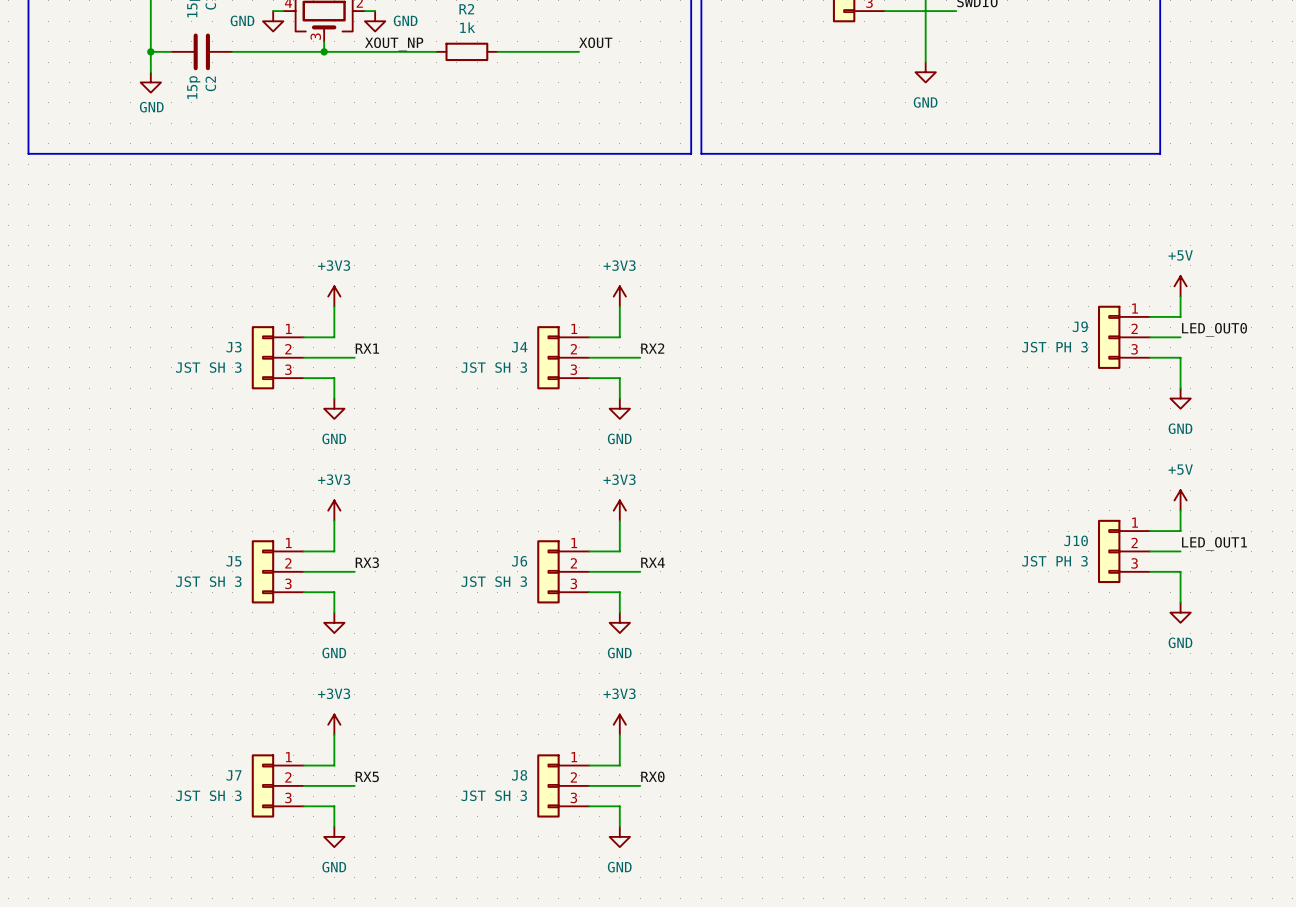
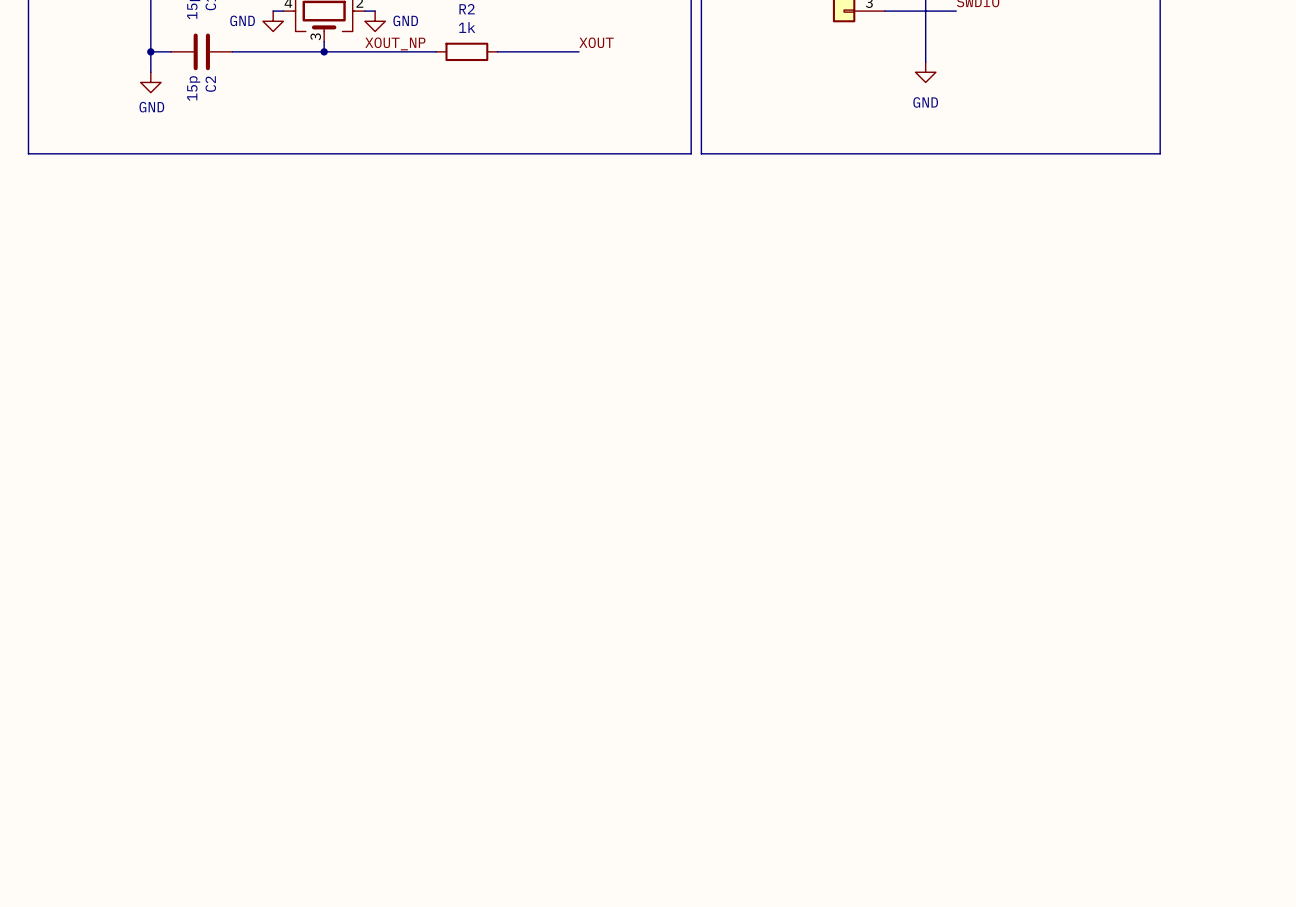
power symbol: +5V (1180, 286) -> none
power symbol: +3V3 (334, 296) -> none
power symbol: +3V3 (619, 296) -> none
wire: (1180, 296) (1180, 316) (1149, 316) -> none
wire: (334, 306) (334, 337) (303, 337) -> none
wire: (619, 306) (619, 337) (589, 337) -> none
label: LED_OUT0 (1214, 329) -> none
J9: JST PH 3 (1123, 337) -> none
wire: (1149, 337) (1180, 337) -> none
label: RX1 (367, 348) -> none
label: RX2 (652, 348) -> none
J3: JST SH 3 (277, 357) -> none
wire: (303, 357) (354, 357) -> none
J4: JST SH 3 (563, 357) -> none
wire: (589, 357) (640, 357) -> none
wire: (1149, 357) (1180, 357) (1180, 388) -> none
wire: (303, 378) (334, 378) (334, 398) -> none
wire: (589, 378) (619, 378) (619, 398) -> none
power symbol: GND (1180, 398) -> none
power symbol: GND (334, 408) -> none
power symbol: GND (619, 408) -> none
power symbol: +5V (1180, 500) -> none
power symbol: +3V3 (334, 510) -> none
power symbol: +3V3 (619, 510) -> none
wire: (1180, 510) (1180, 531) (1149, 531) -> none
wire: (334, 520) (334, 551) (303, 551) -> none
wire: (619, 520) (619, 551) (589, 551) -> none
label: LED_OUT1 (1214, 543) -> none
J10: JST PH 3 (1123, 551) -> none
wire: (1149, 551) (1180, 551) -> none
label: RX3 (367, 562) -> none
label: RX4 (652, 562) -> none
J5: JST SH 3 (277, 571) -> none
wire: (303, 571) (354, 571) -> none
J6: JST SH 3 (563, 571) -> none
wire: (589, 571) (640, 571) -> none
wire: (1149, 571) (1180, 571) (1180, 602) -> none
wire: (303, 592) (334, 592) (334, 612) -> none
wire: (589, 592) (619, 592) (619, 612) -> none
power symbol: GND (1180, 612) -> none
power symbol: GND (334, 622) -> none
power symbol: GND (619, 622) -> none
power symbol: +3V3 (334, 724) -> none
power symbol: +3V3 (619, 724) -> none
wire: (334, 734) (334, 765) (303, 765) -> none
wire: (619, 734) (619, 765) (589, 765) -> none
label: RX5 (367, 776) -> none
label: RX0 (652, 776) -> none
J7: JST SH 3 (277, 785) -> none
wire: (303, 785) (354, 785) -> none
J8: JST SH 3 (563, 785) -> none
wire: (589, 785) (640, 785) -> none
wire: (303, 806) (334, 806) (334, 826) -> none
wire: (589, 806) (619, 806) (619, 826) -> none
power symbol: GND (334, 836) -> none
power symbol: GND (619, 836) -> none

